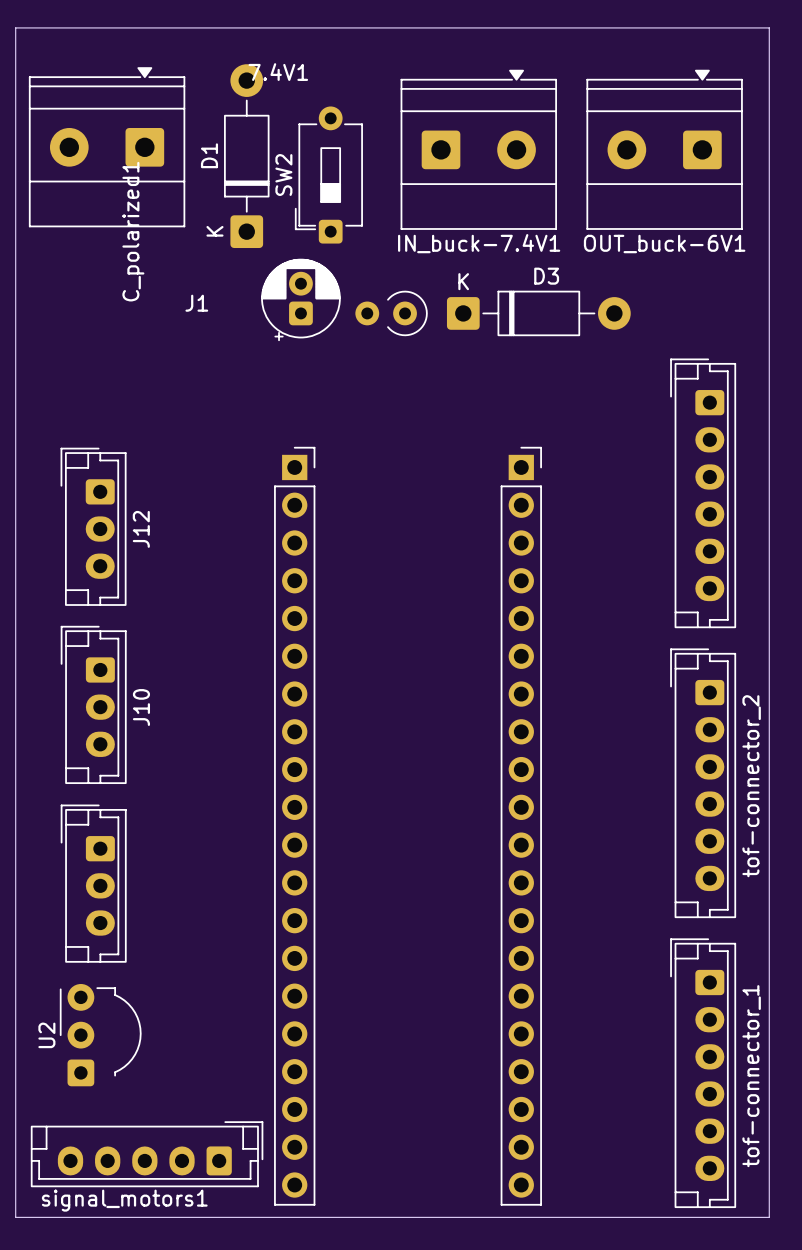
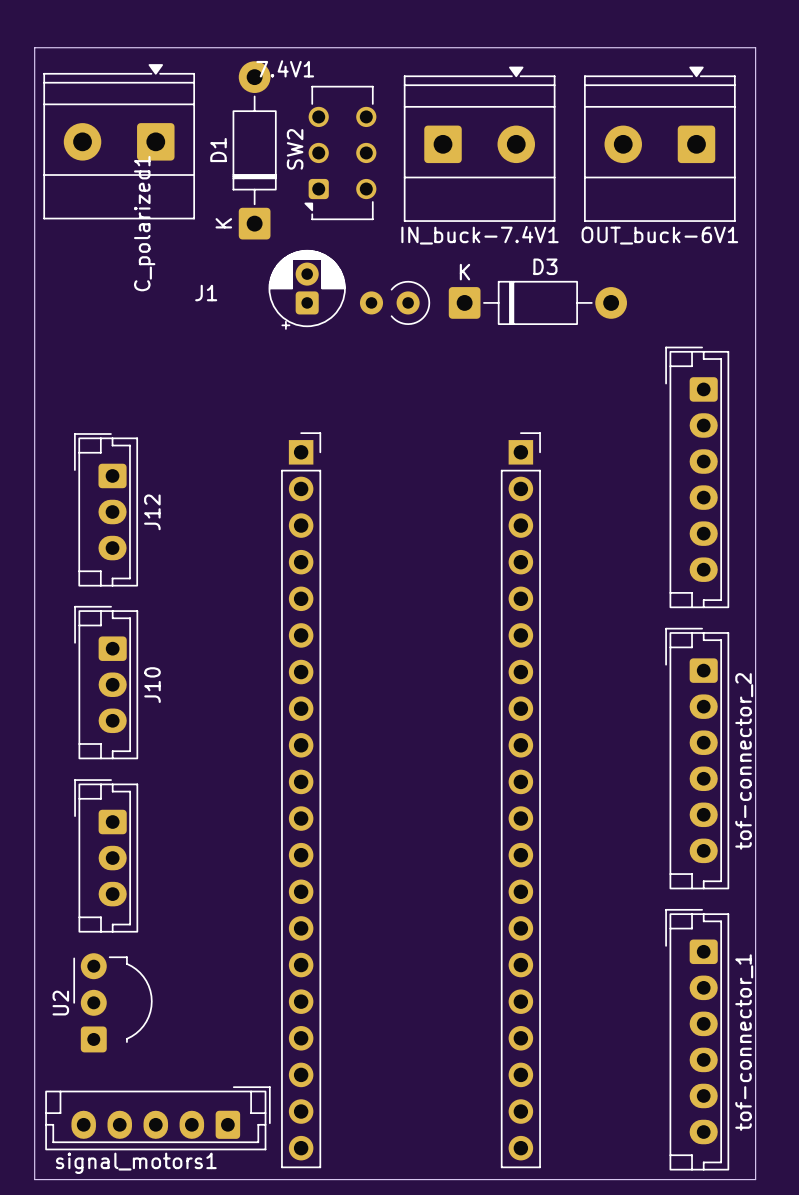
SW2 footprint: [294, 106, 363, 244] -> [304, 85, 377, 221]
board edge: (19, 1217) (15, 1217) (15, 27) (769, 27) (769, 1217) (763, 1217) -> (34, 1179) (34, 47) (755, 47) (755, 1179)

